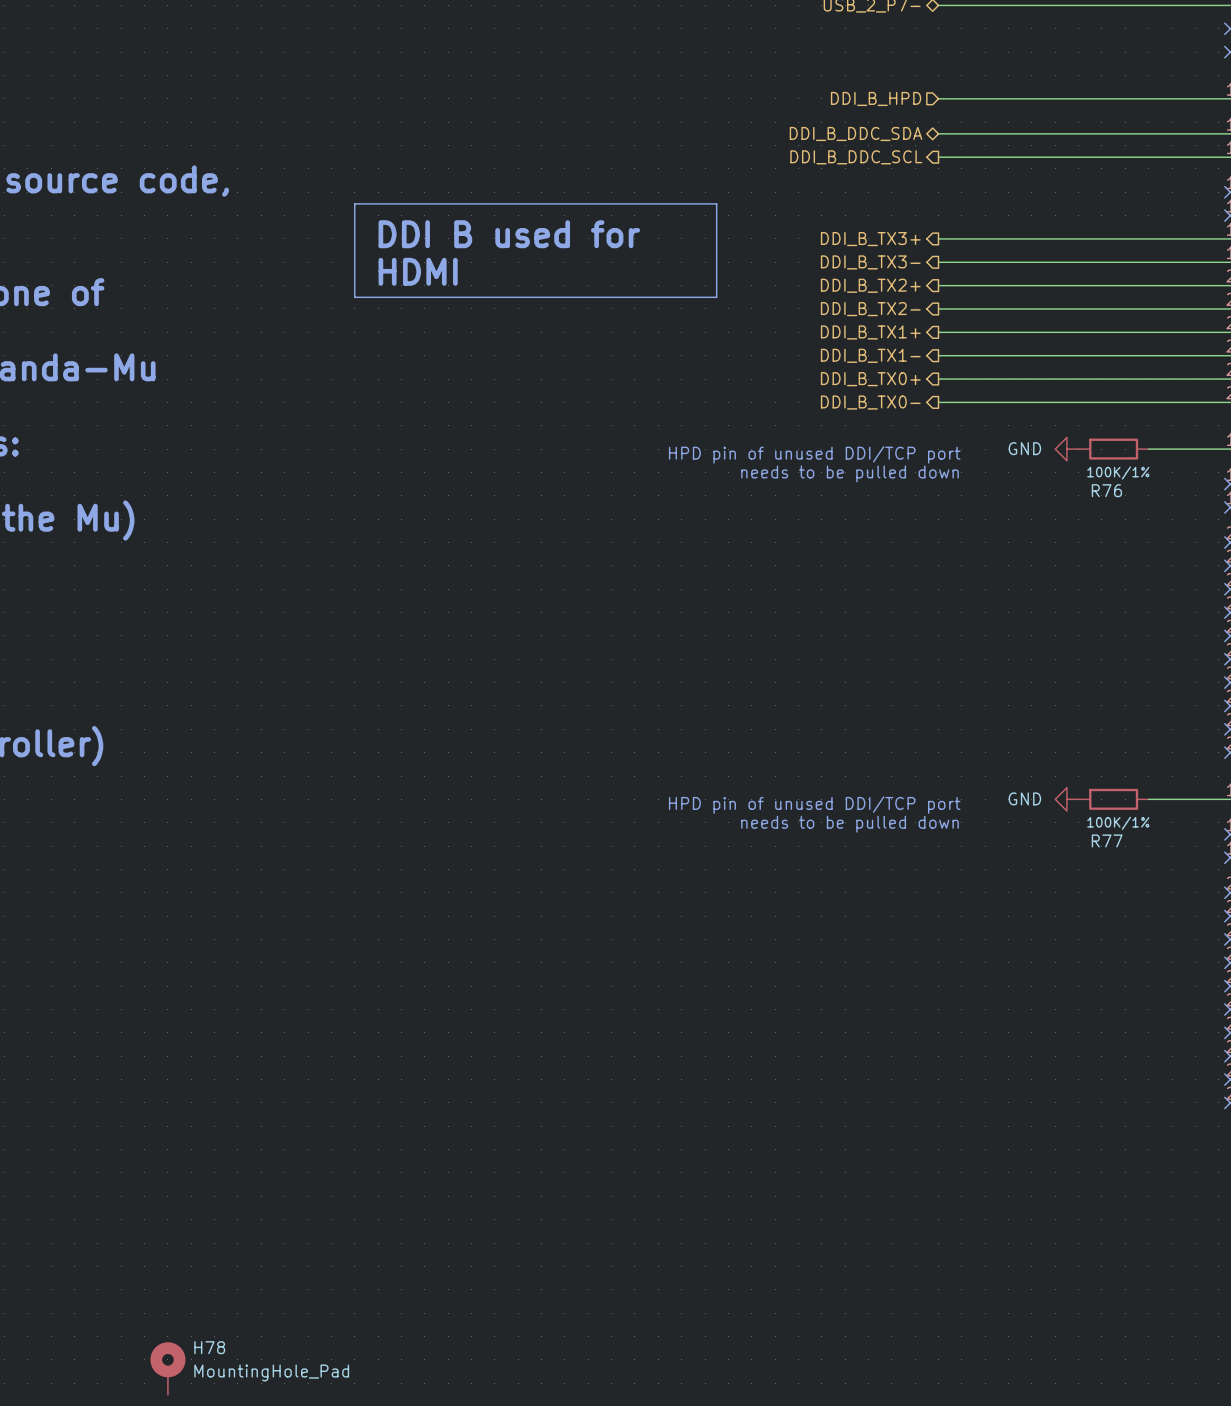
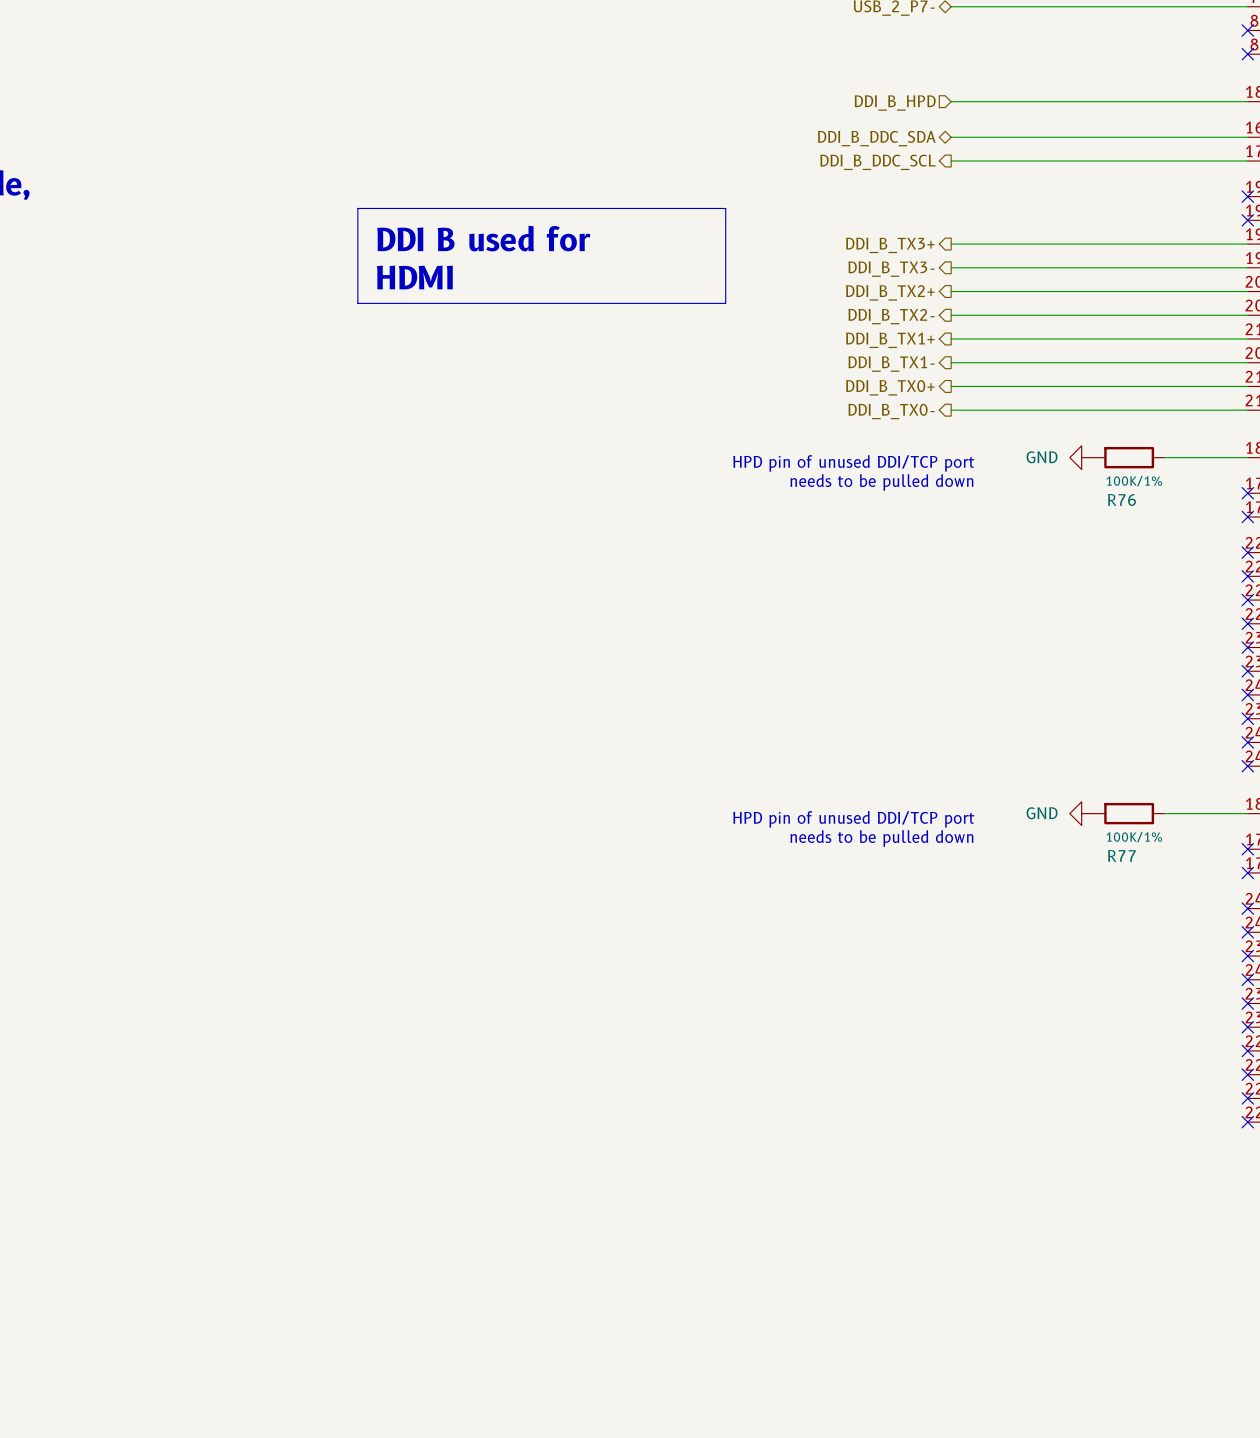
H78: MountingHole_Pad (167, 1368) -> none

